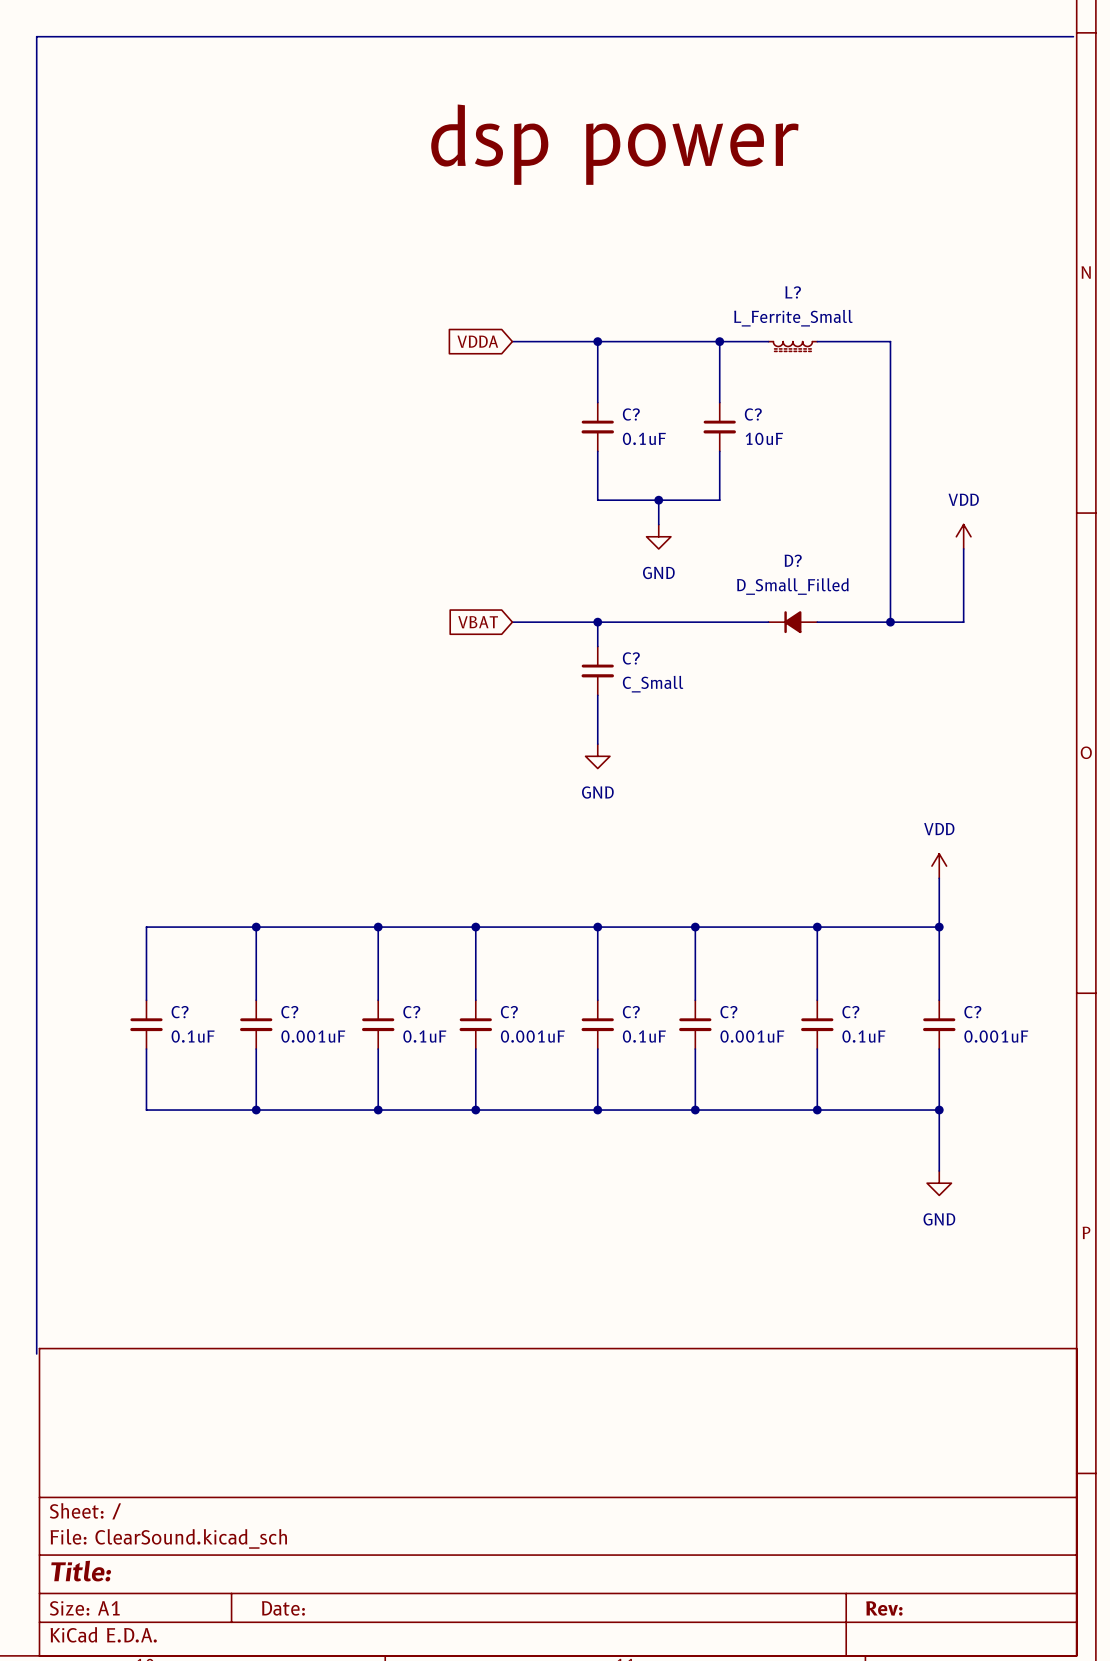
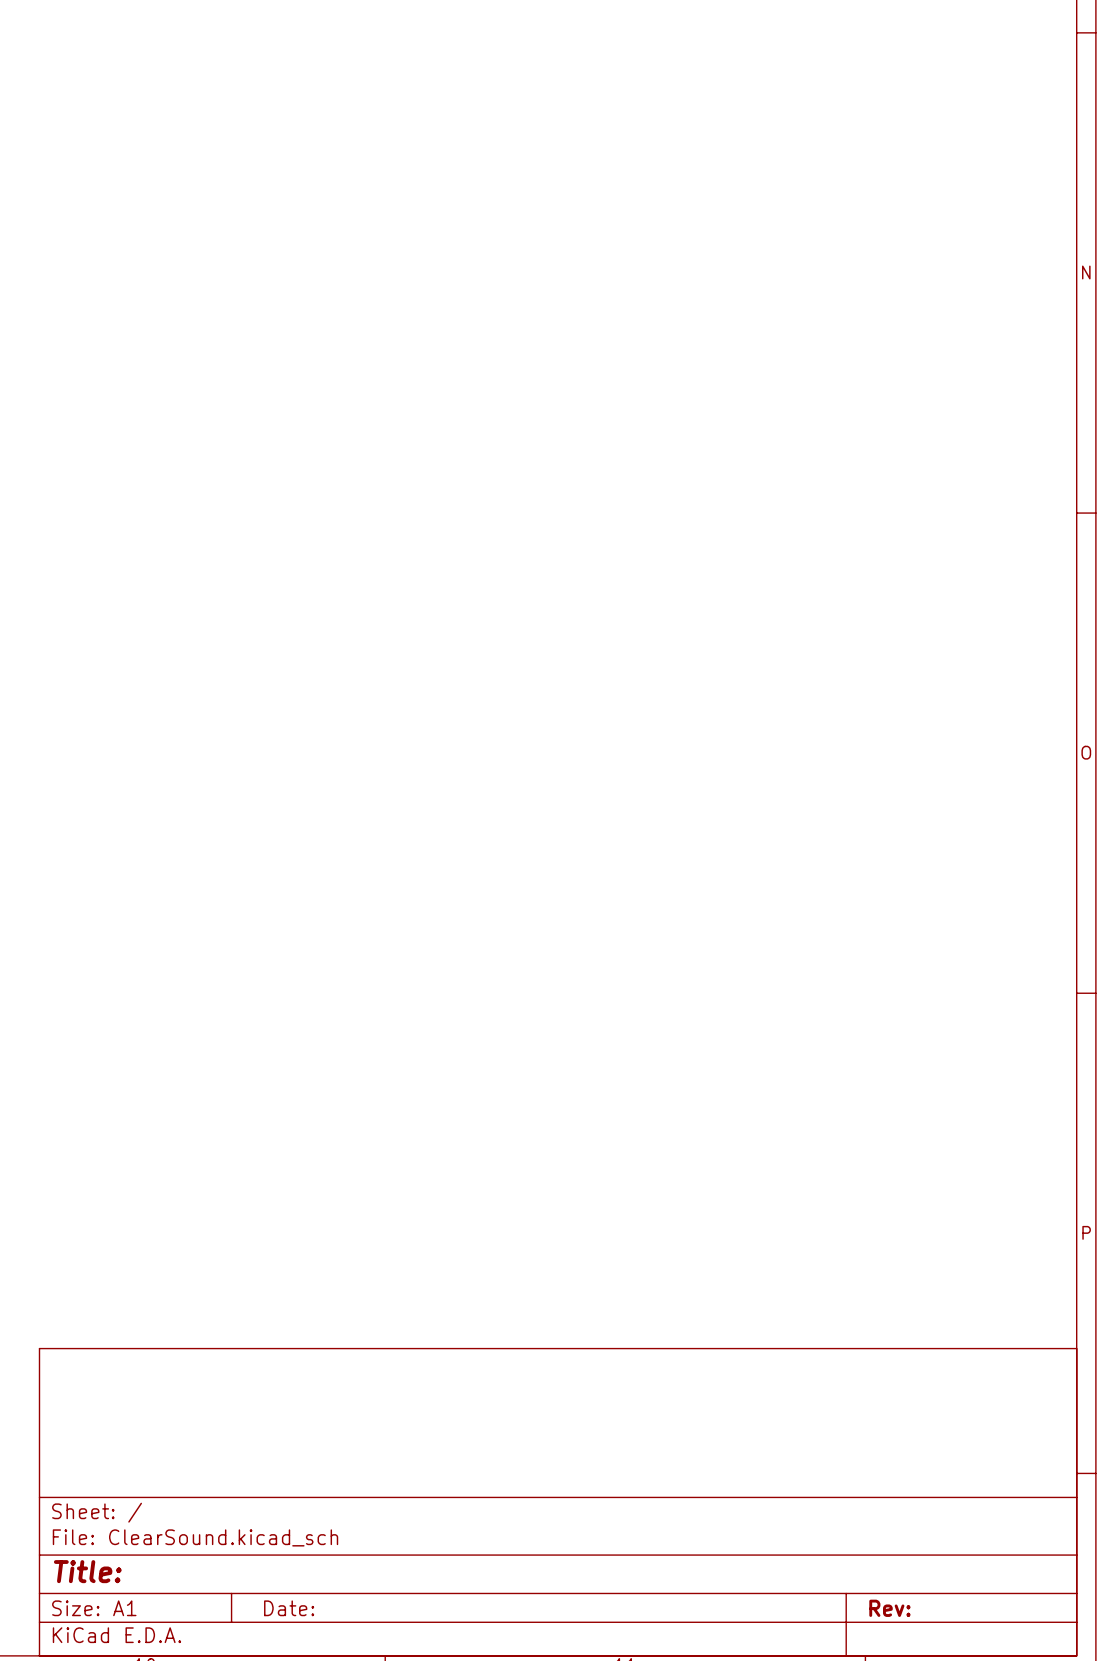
line: (1073, 36) (36, 36) (36, 1353) -> none
label: dsp power (614, 144) -> none
global label: VDDA (477, 341) -> none
wire: (512, 341) (768, 341) -> none
wire: (597, 341) (597, 402) -> none
junction: (597, 341) -> none
wire: (719, 341) (719, 402) -> none
junction: (719, 341) -> none
wire: (817, 341) (890, 341) (890, 622) -> none
L?: L_Ferrite_Small (792, 346) -> none
C?: 0.1uF (597, 427) -> none
C?: 10uF (719, 427) -> none
wire: (597, 451) (597, 500) (719, 500) (719, 451) -> none
wire: (658, 500) (658, 524) -> none
junction: (658, 500) -> none
power symbol: GND (658, 536) -> none
power symbol: VDD (963, 536) -> none
wire: (963, 548) (963, 622) (817, 622) -> none
global label: VBAT (478, 622) -> none
wire: (512, 622) (768, 622) -> none
wire: (597, 622) (597, 646) -> none
junction: (597, 622) -> none
D?: D_Small_Filled (792, 622) -> none
junction: (890, 622) -> none
C?: C_Small (597, 670) -> none
wire: (597, 695) (597, 744) -> none
power symbol: GND (597, 756) -> none
power symbol: VDD (939, 866) -> none
wire: (939, 878) (939, 1000) -> none
wire: (256, 927) (256, 1000) -> none
junction: (256, 927) -> none
wire: (378, 927) (378, 1000) -> none
junction: (378, 927) -> none
wire: (475, 927) (475, 1000) -> none
junction: (475, 927) -> none
wire: (597, 927) (597, 1000) -> none
junction: (597, 927) -> none
wire: (695, 927) (695, 1000) -> none
junction: (695, 927) -> none
wire: (817, 927) (817, 1000) -> none
junction: (817, 927) -> none
wire: (939, 927) (146, 927) (146, 1000) -> none
junction: (939, 927) -> none
C?: 0.1uF (146, 1024) -> none
C?: 0.001uF (256, 1024) -> none
C?: 0.1uF (378, 1024) -> none
C?: 0.001uF (475, 1024) -> none
C?: 0.1uF (597, 1024) -> none
C?: 0.001uF (695, 1024) -> none
C?: 0.1uF (817, 1024) -> none
C?: 0.001uF (939, 1024) -> none
wire: (146, 1049) (146, 1110) (939, 1110) -> none
wire: (256, 1049) (256, 1110) -> none
wire: (378, 1049) (378, 1110) -> none
wire: (475, 1049) (475, 1110) -> none
wire: (597, 1049) (597, 1110) -> none
wire: (695, 1049) (695, 1110) -> none
wire: (817, 1049) (817, 1110) -> none
wire: (939, 1049) (939, 1171) -> none
junction: (256, 1110) -> none
junction: (378, 1110) -> none
junction: (475, 1110) -> none
junction: (597, 1110) -> none
junction: (695, 1110) -> none
junction: (817, 1110) -> none
junction: (939, 1110) -> none
power symbol: GND (939, 1183) -> none

